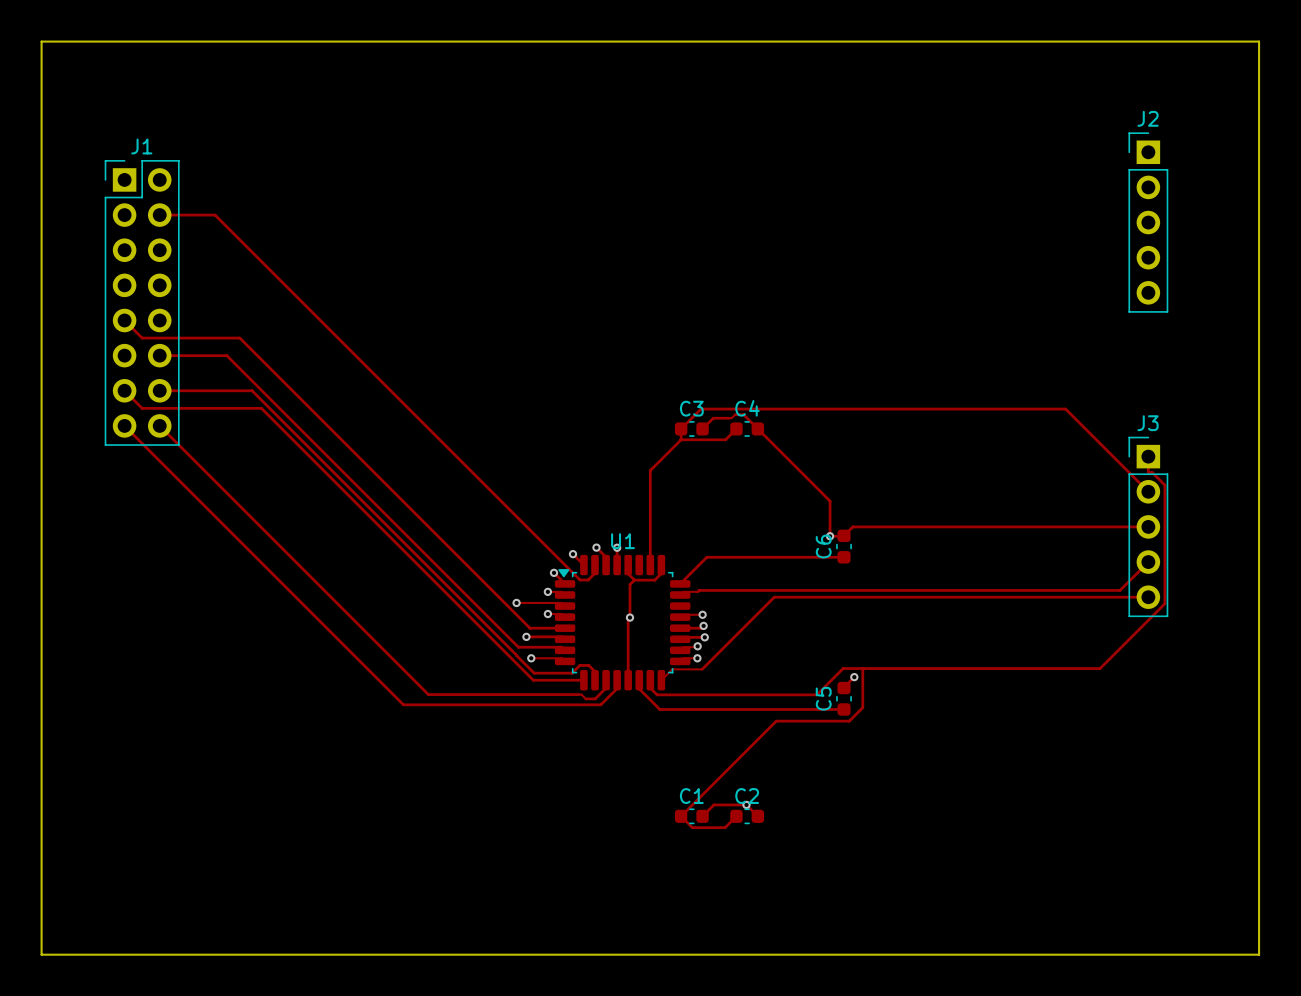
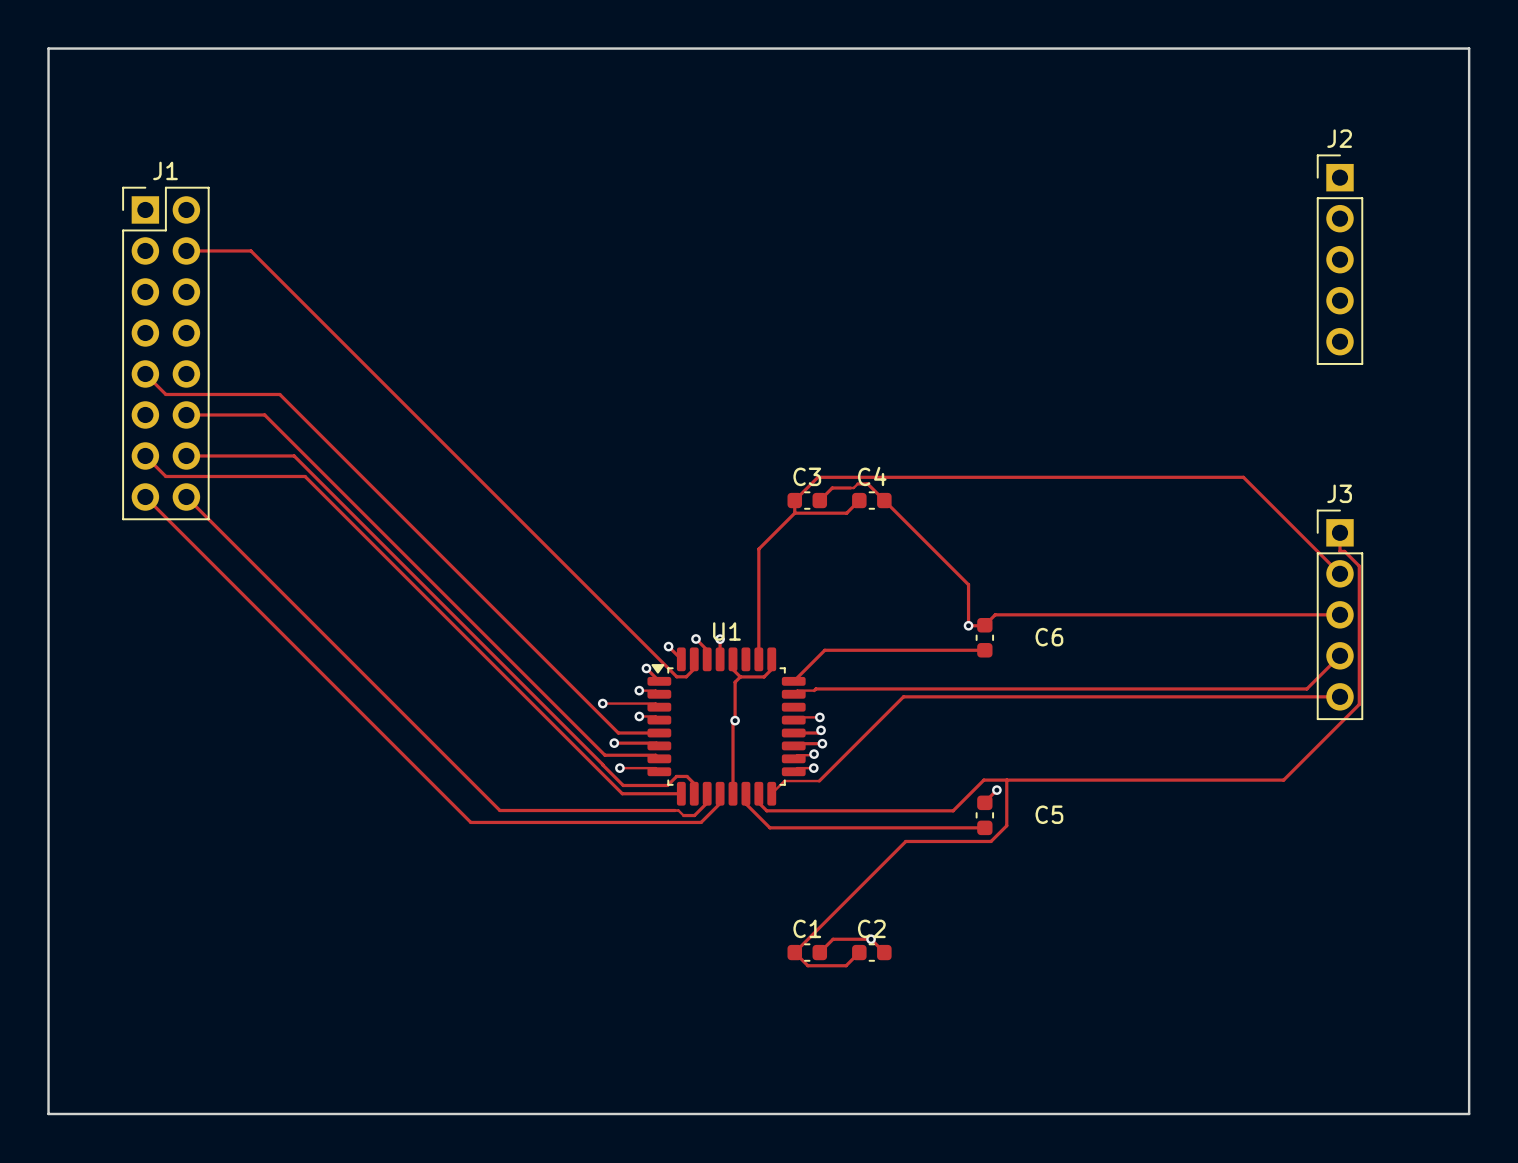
C6 name rotation: 0° (823, 546) -> 90° clockwise (1049, 637)
C6 name position: C6 (823, 546) -> C6 (1049, 637)
C5 name rotation: 0° (823, 698) -> 90° clockwise (1049, 814)
C5 name position: C5 (823, 698) -> C5 (1049, 814)

